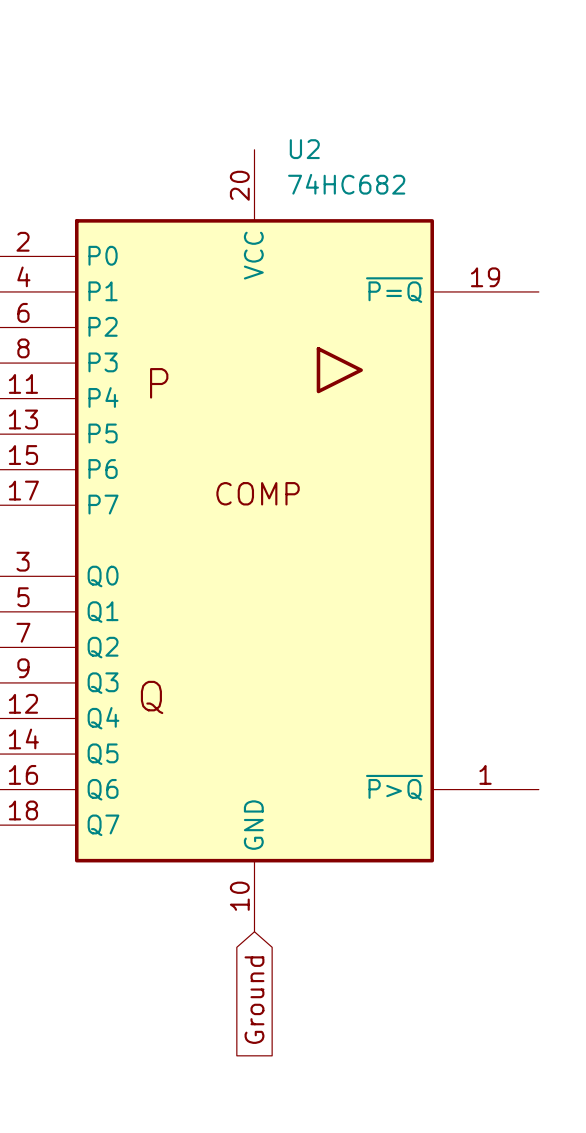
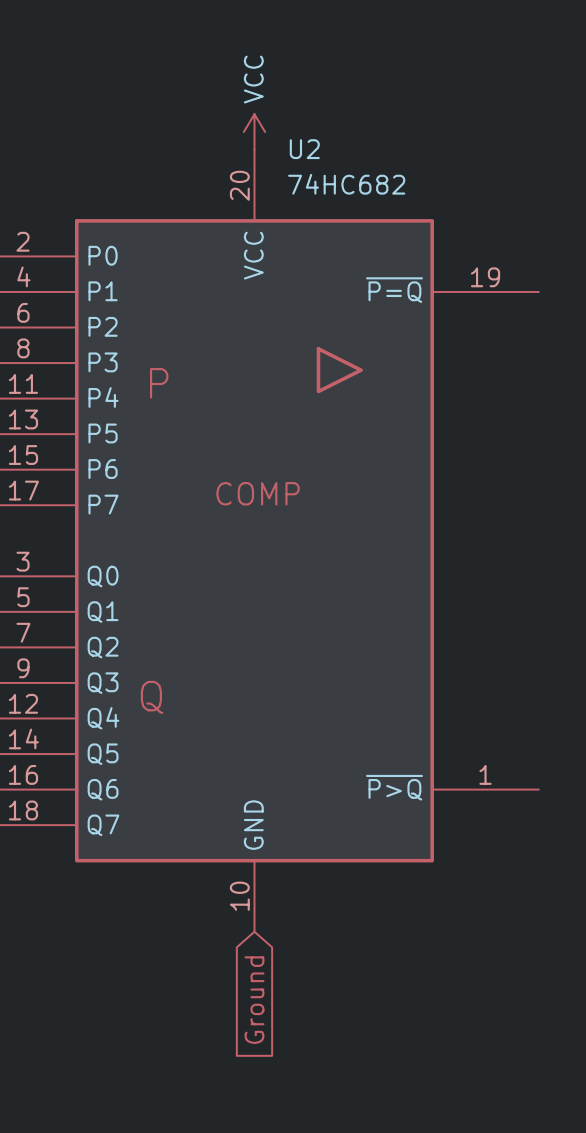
power symbol: none -> VCC (254, 132)

